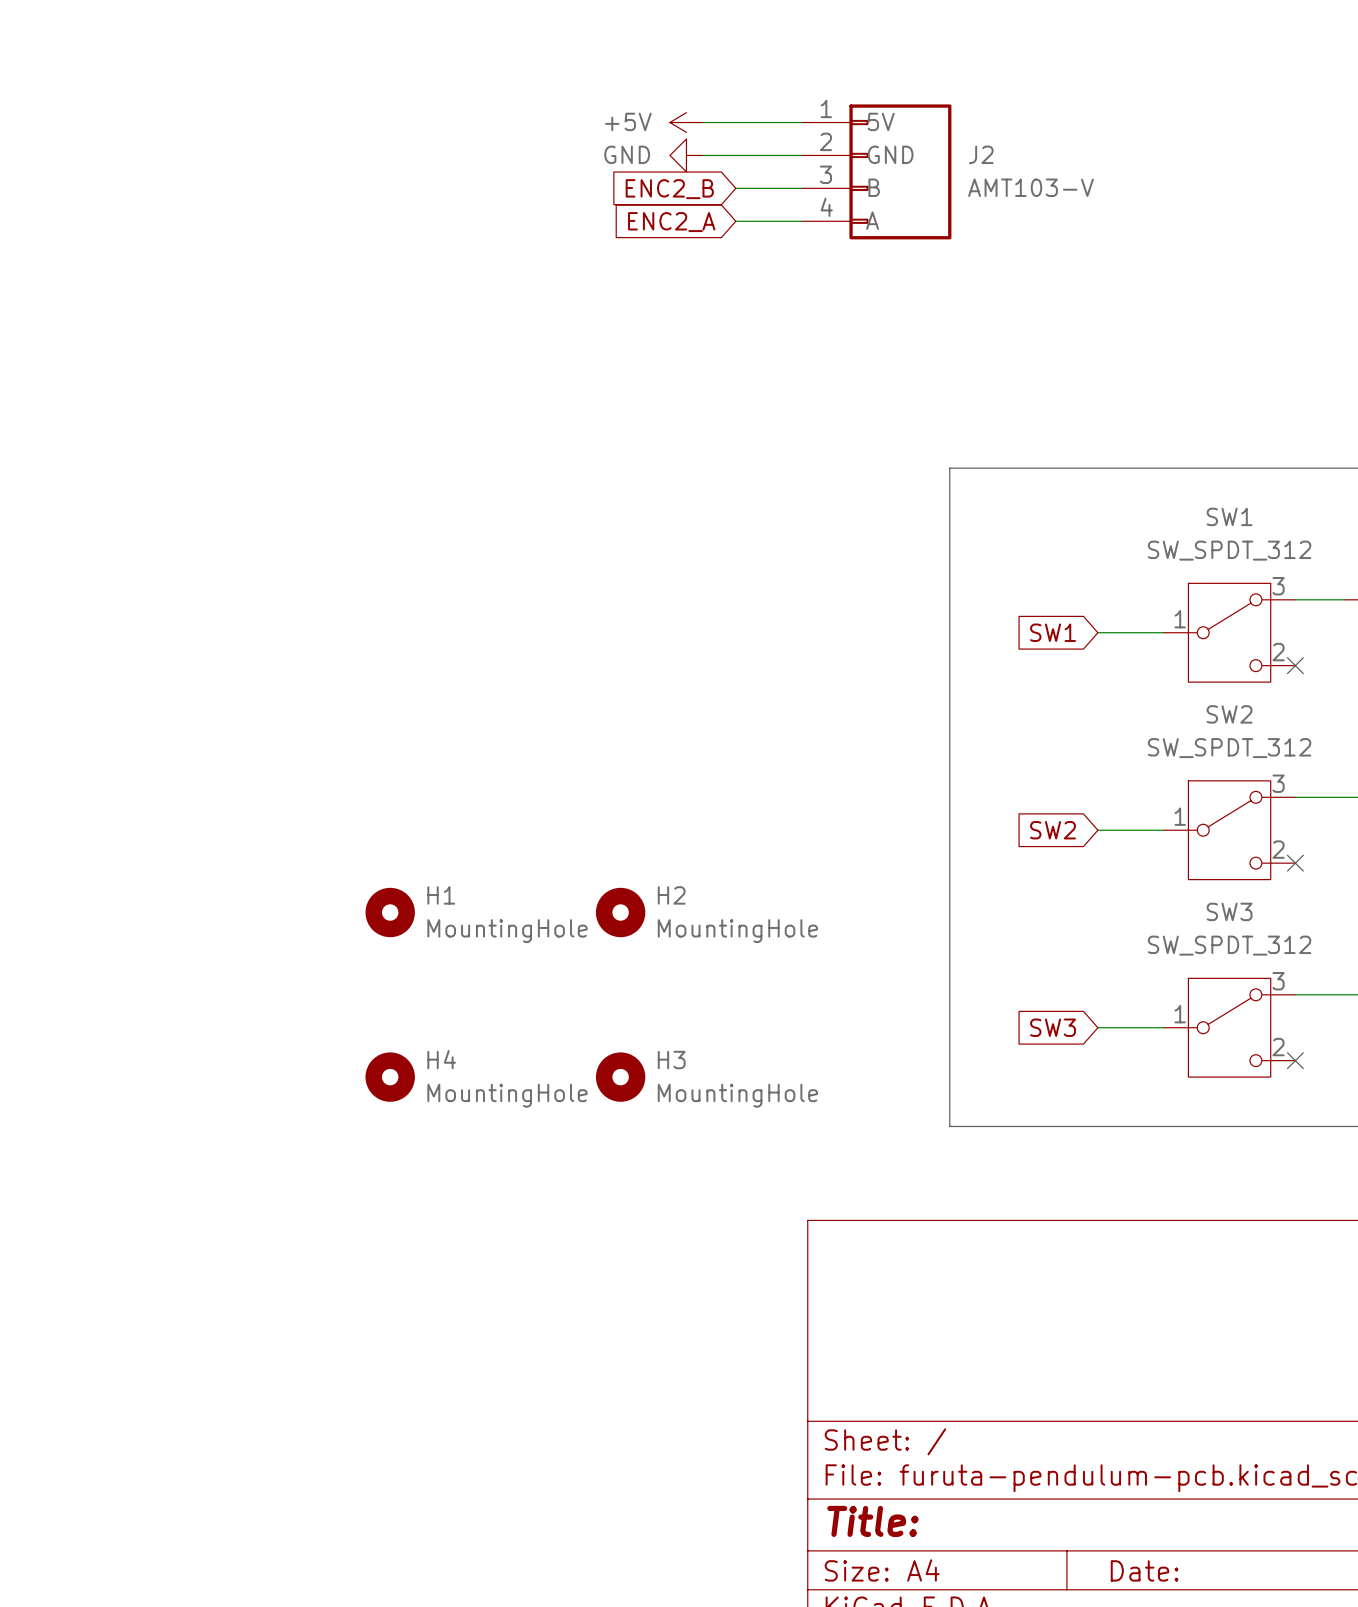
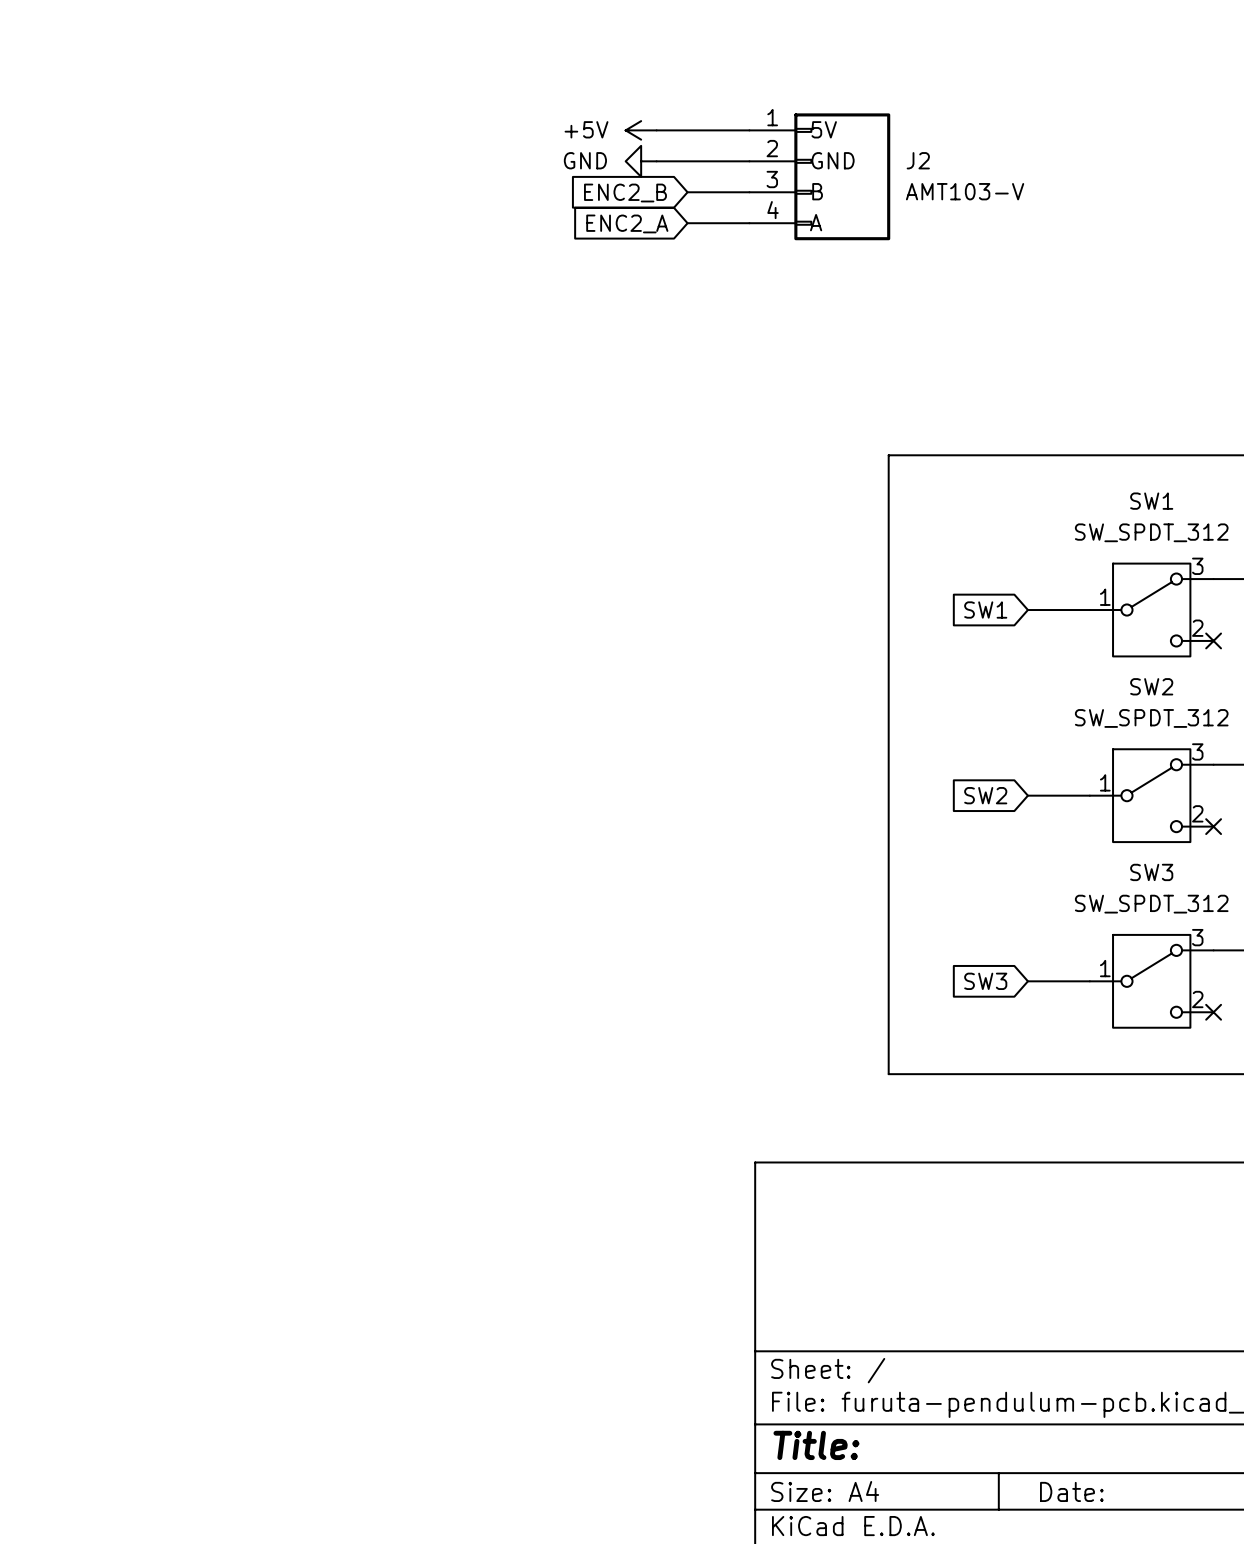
H1: MountingHole (390, 912) -> none
H2: MountingHole (620, 912) -> none
H4: MountingHole (390, 1077) -> none
H3: MountingHole (620, 1077) -> none

